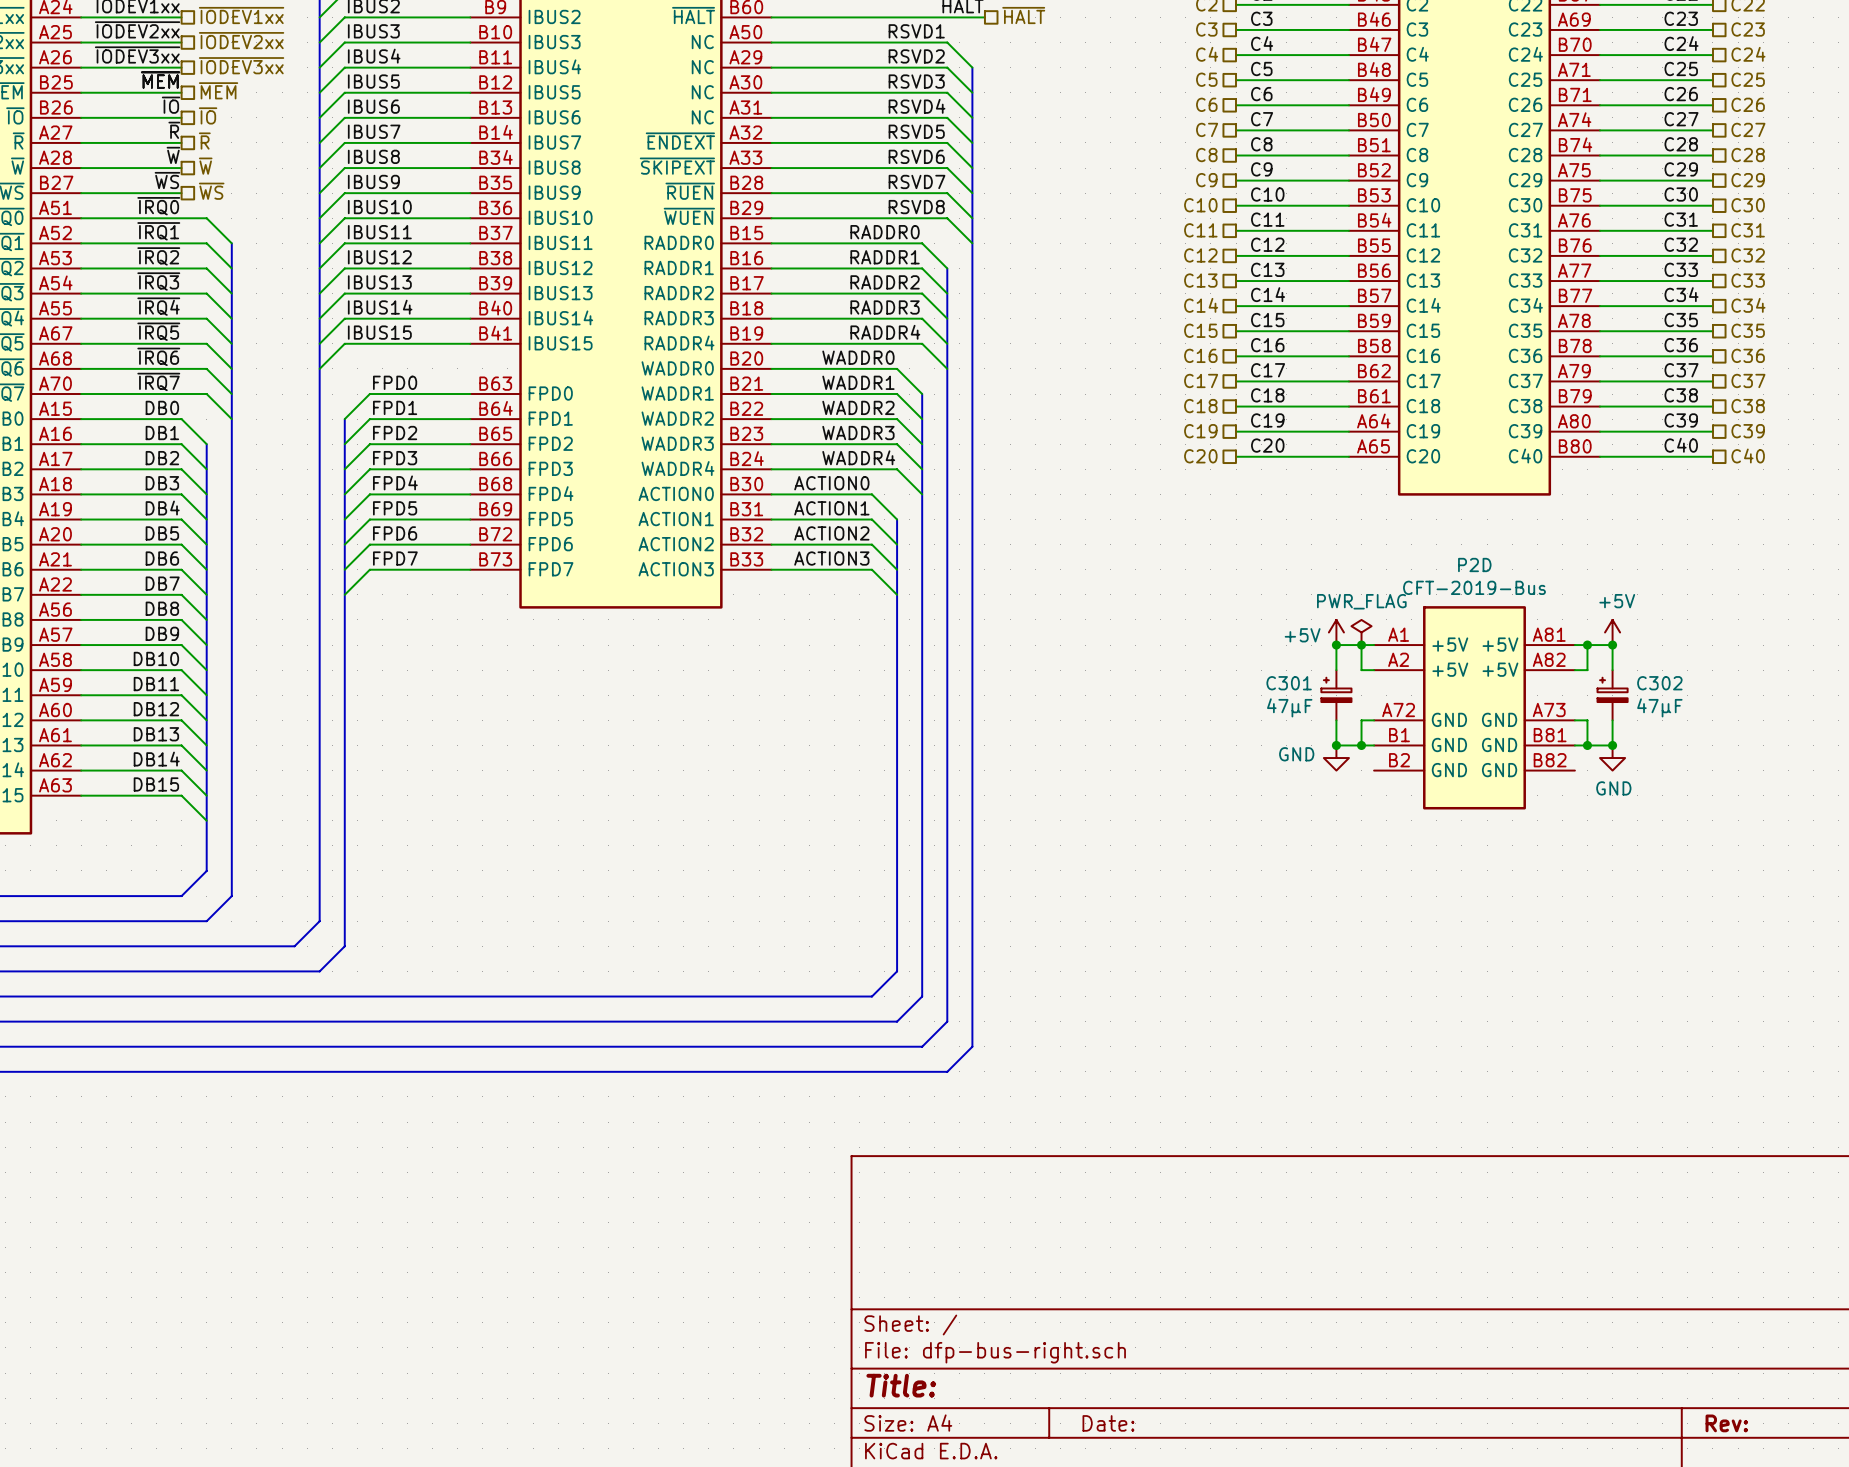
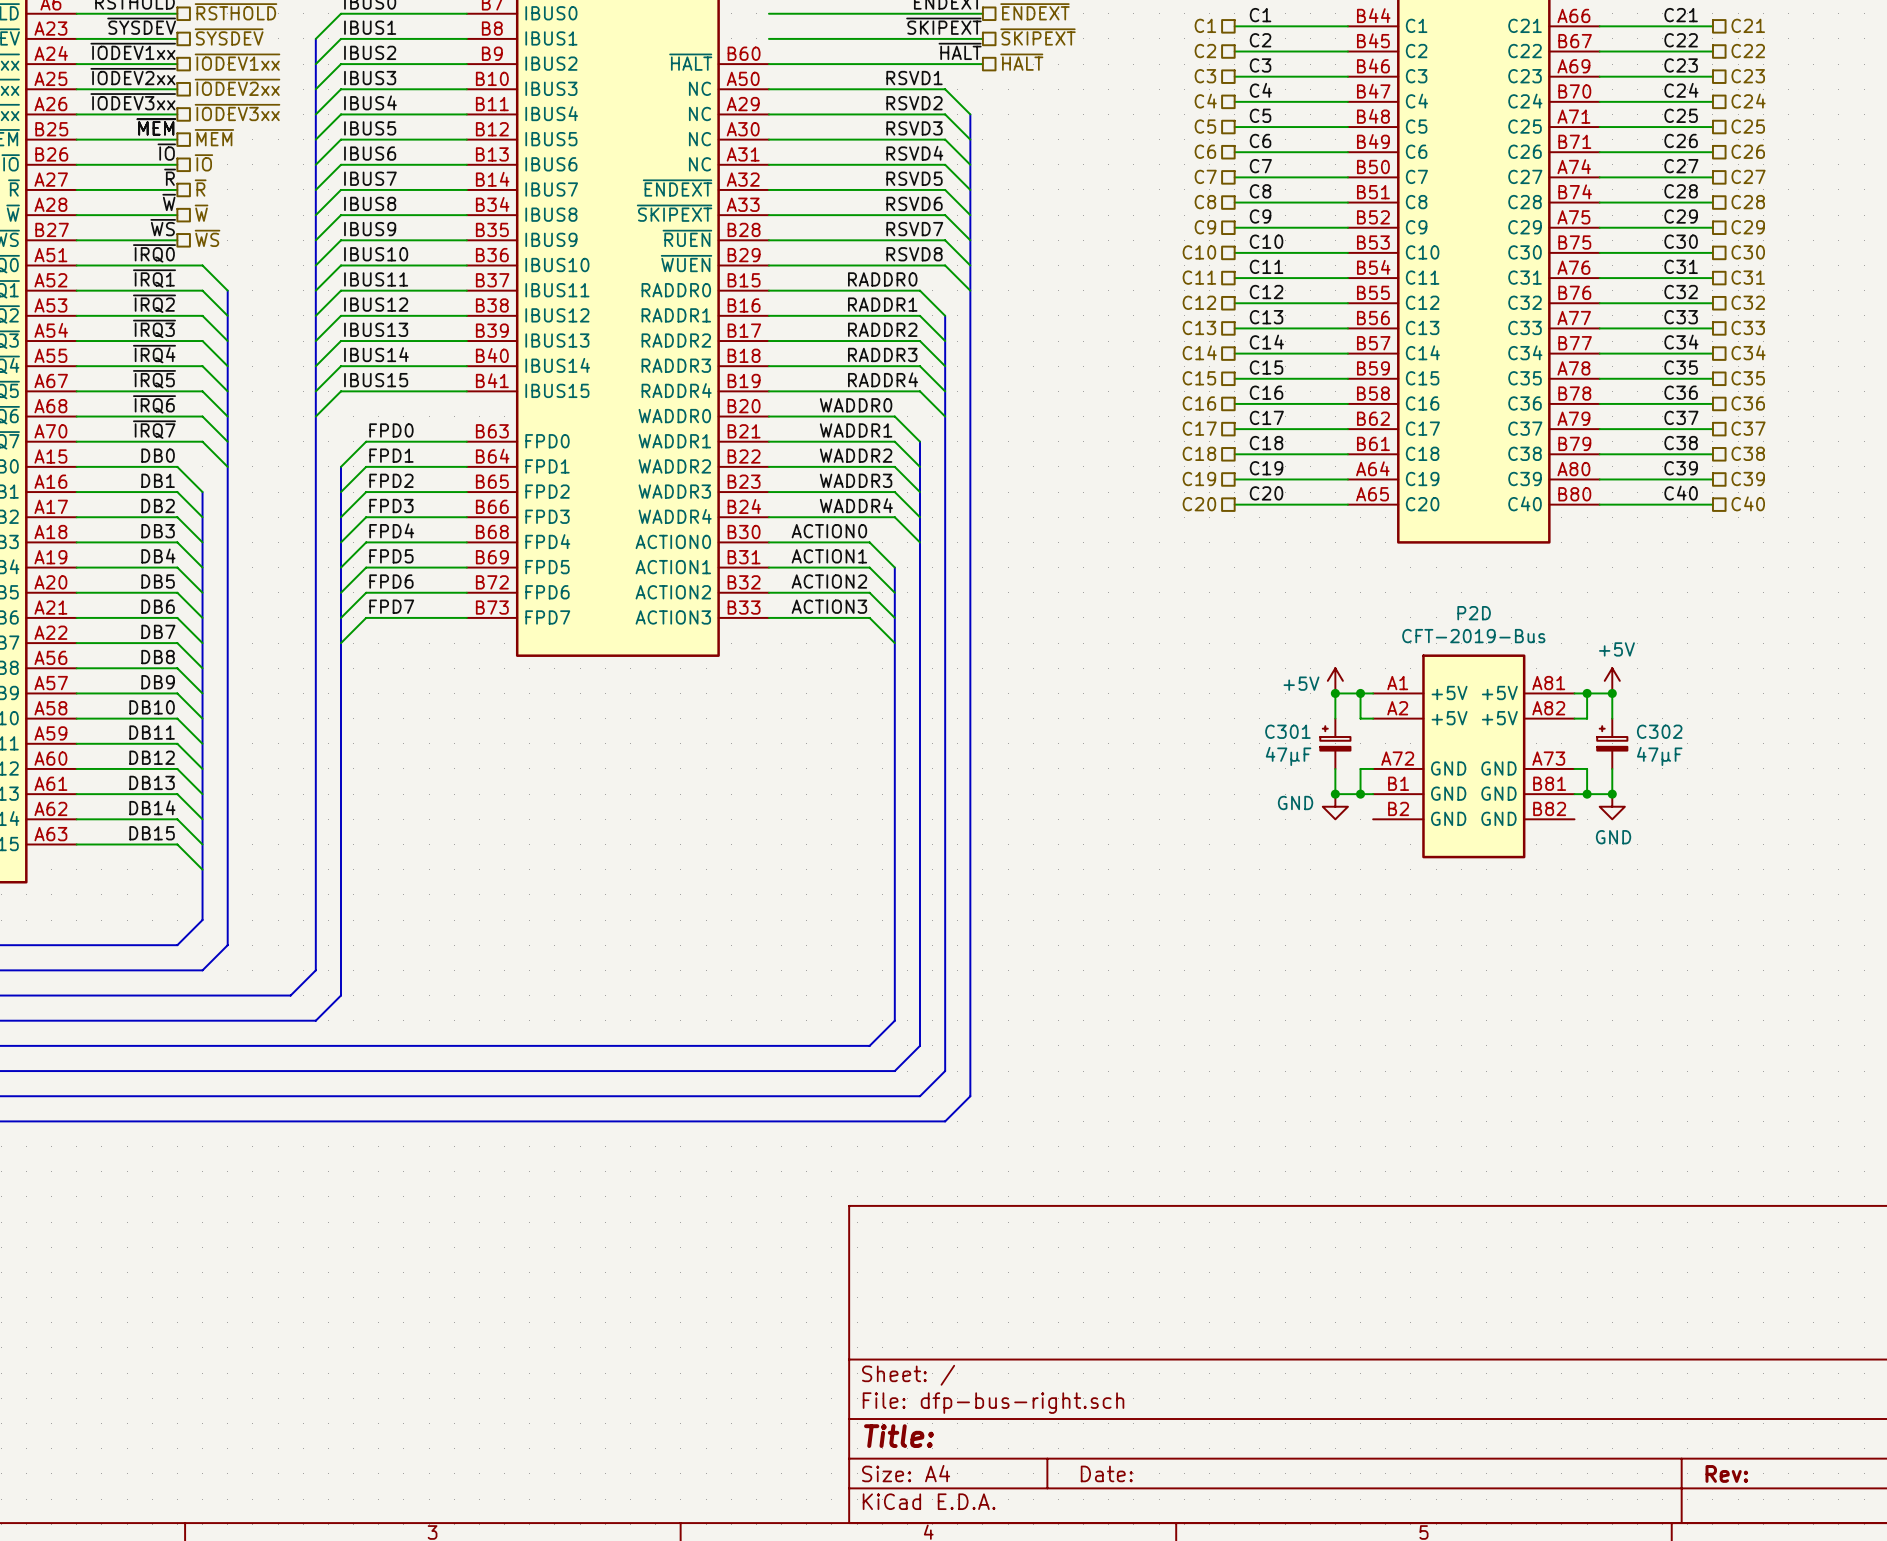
power symbol: PWR_FLAG (1361, 632) -> none

